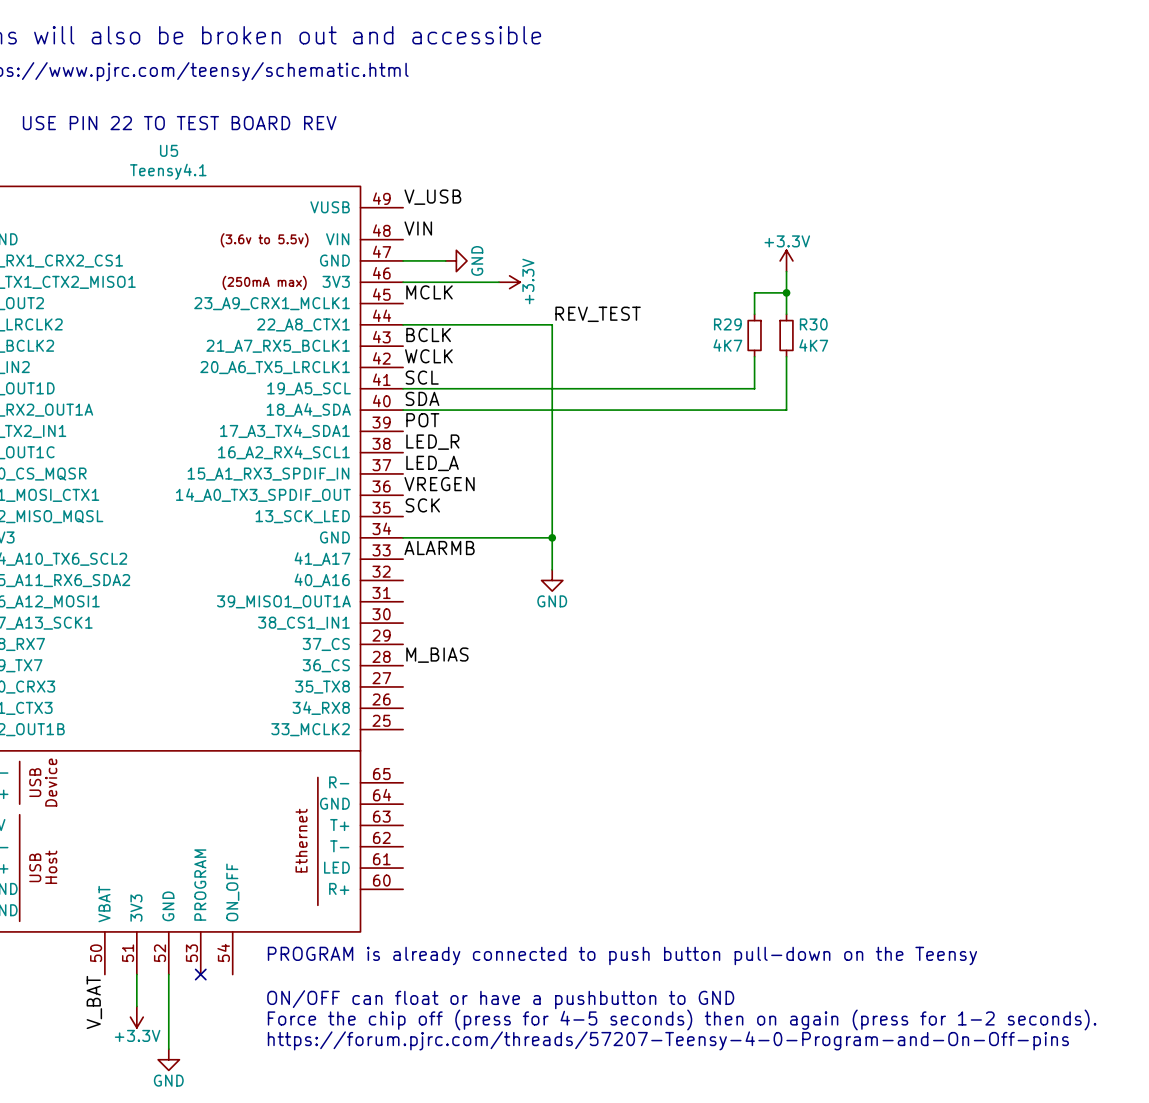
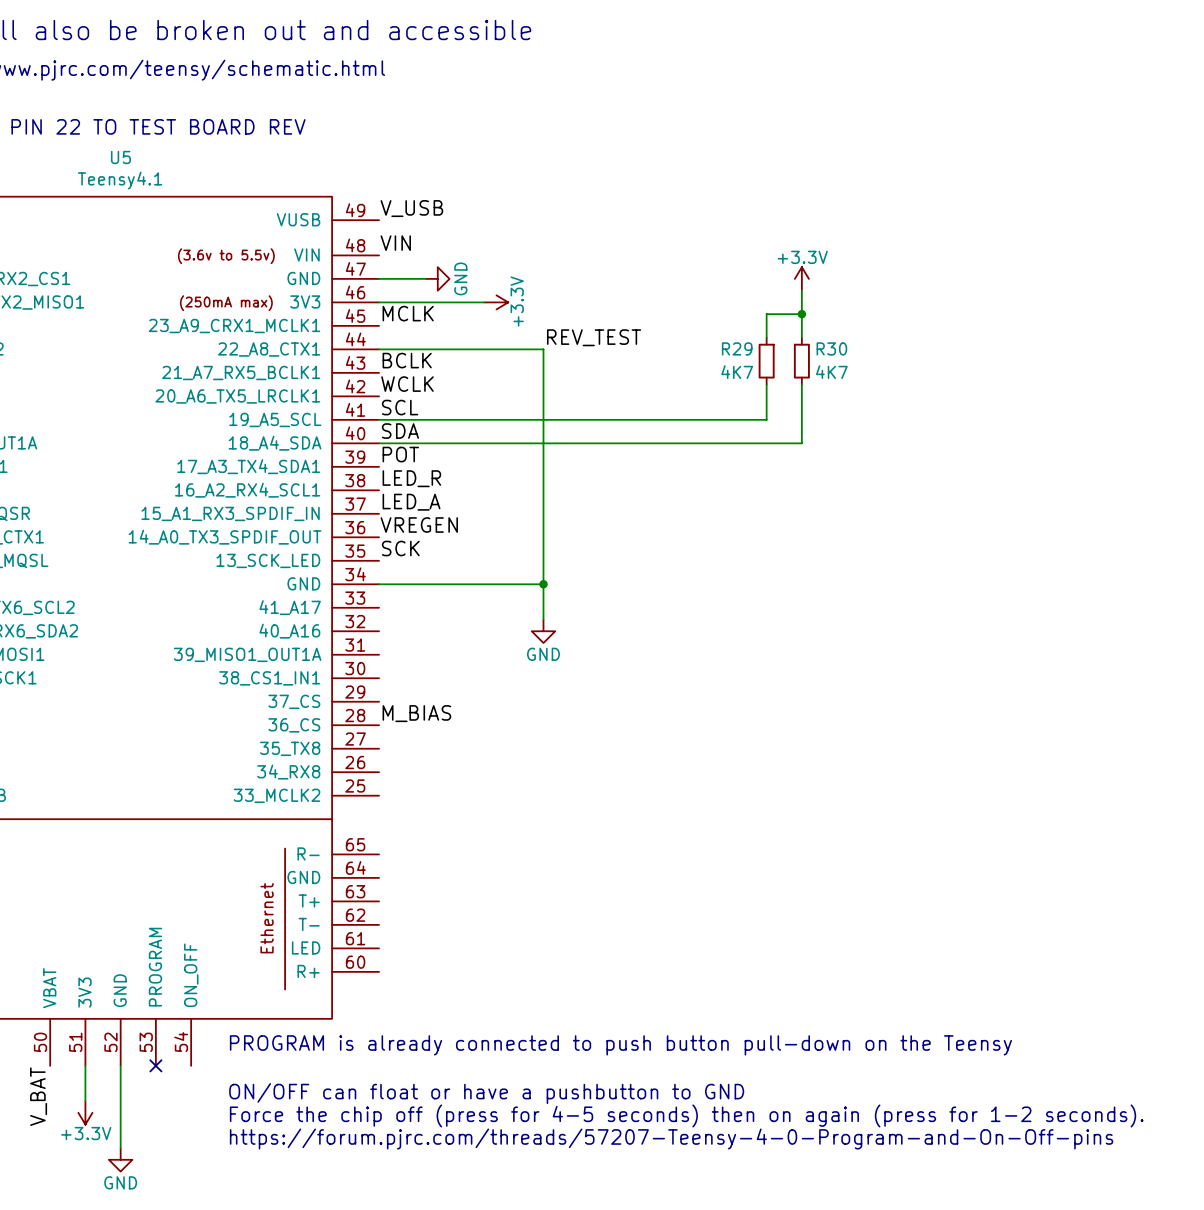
label: ALARMB (439, 548) -> none

